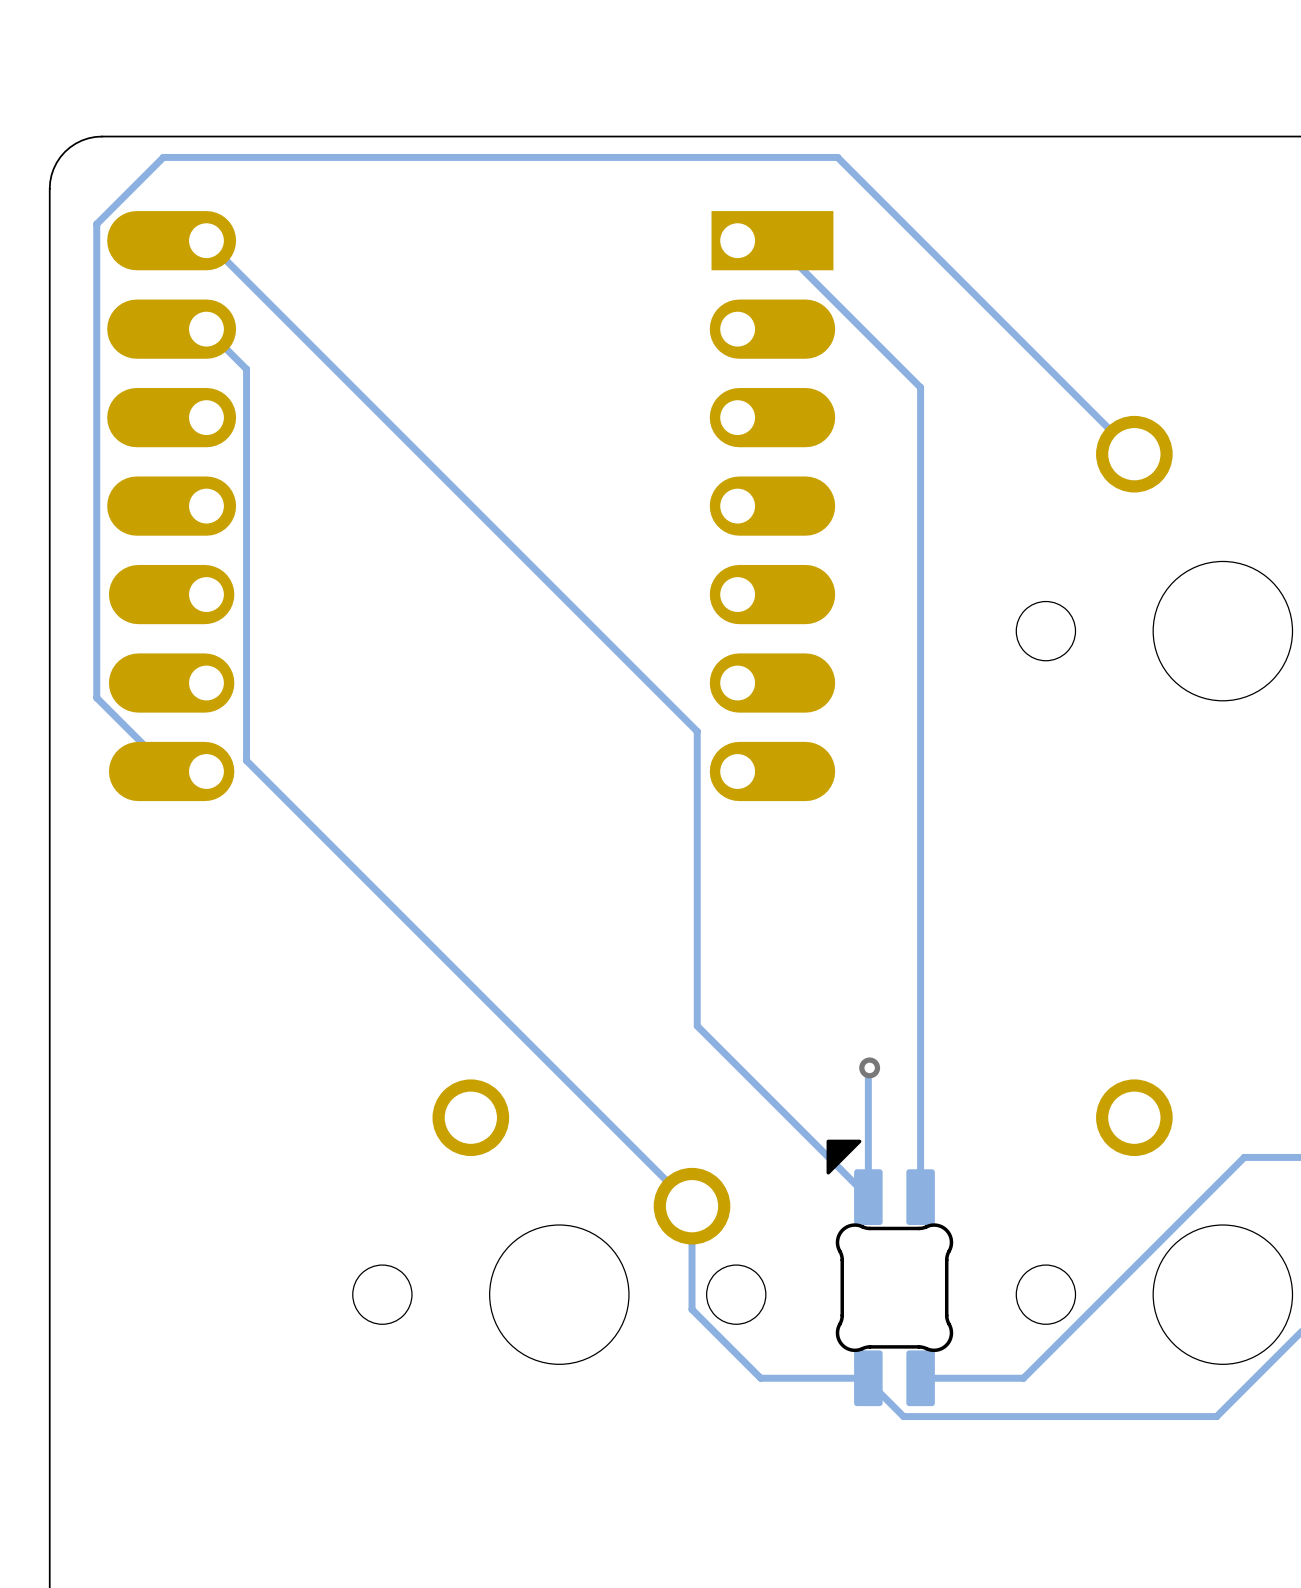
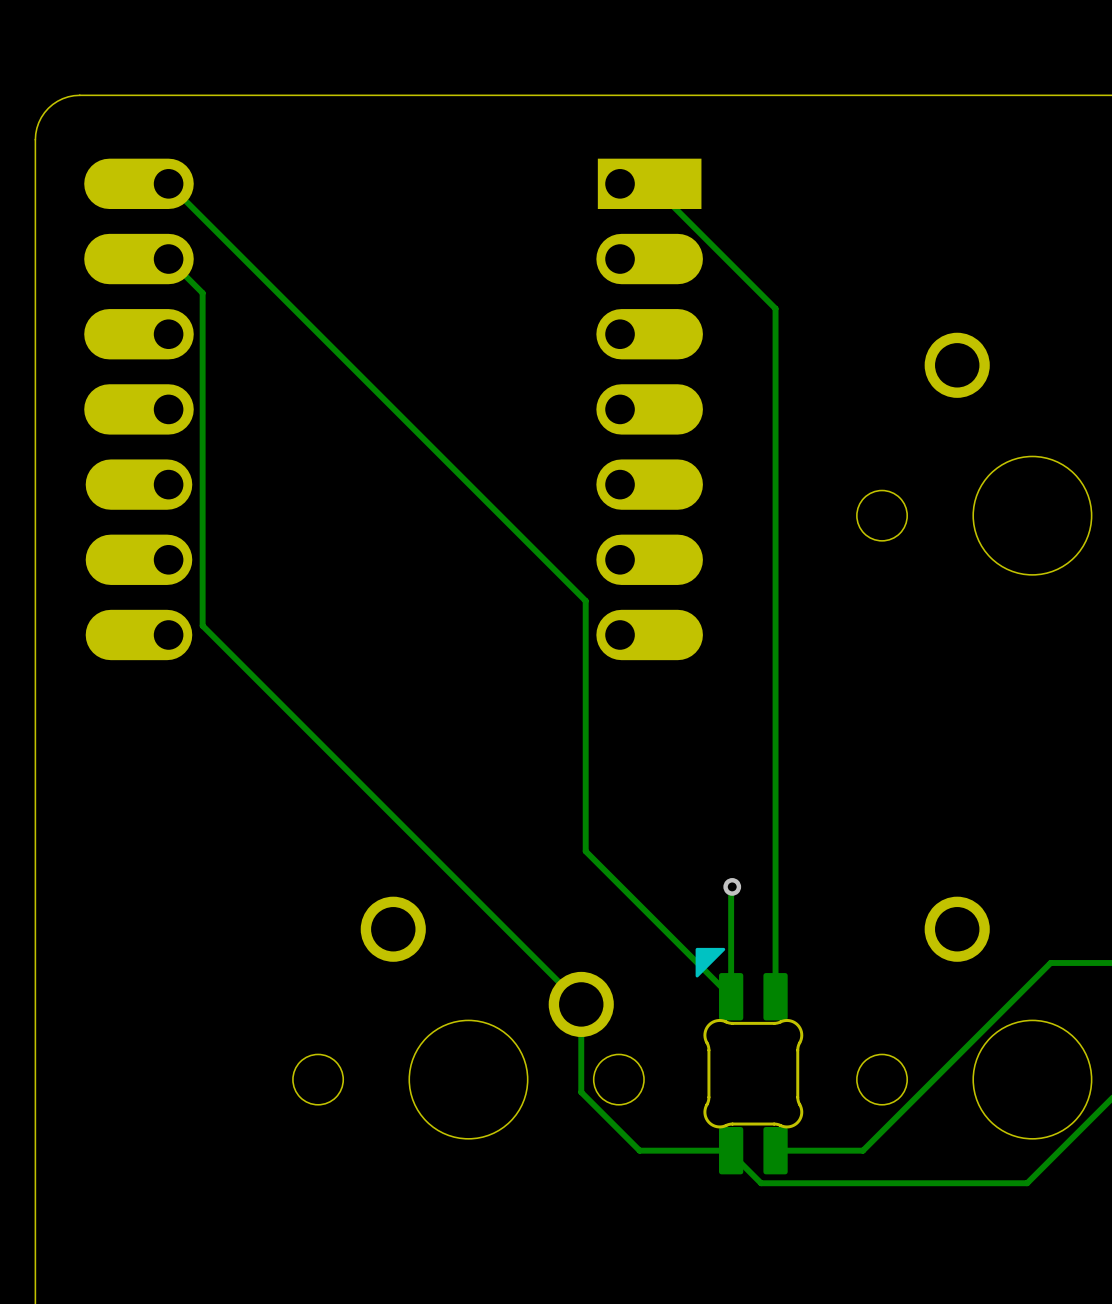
track: (1134, 454) (837, 157) (163, 157) (96, 224) (96, 697) (170, 771) (206, 771) -> none

